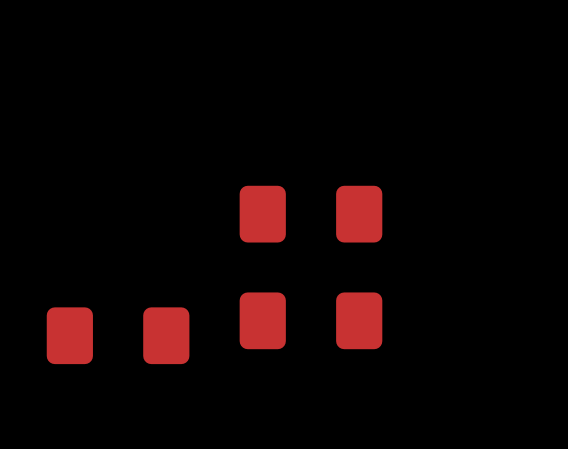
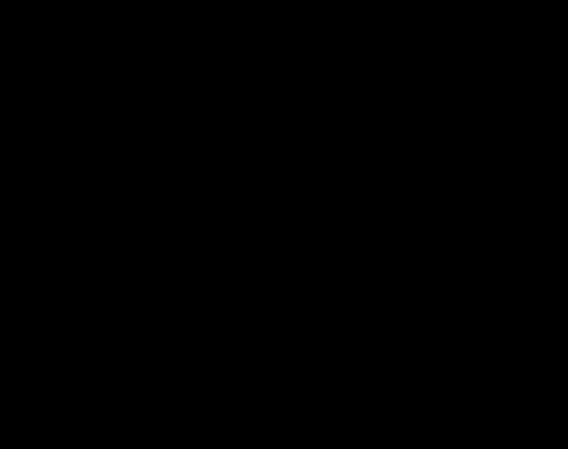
part: (310, 214) -> none
part: (310, 320) -> none
part: (118, 335) -> none

